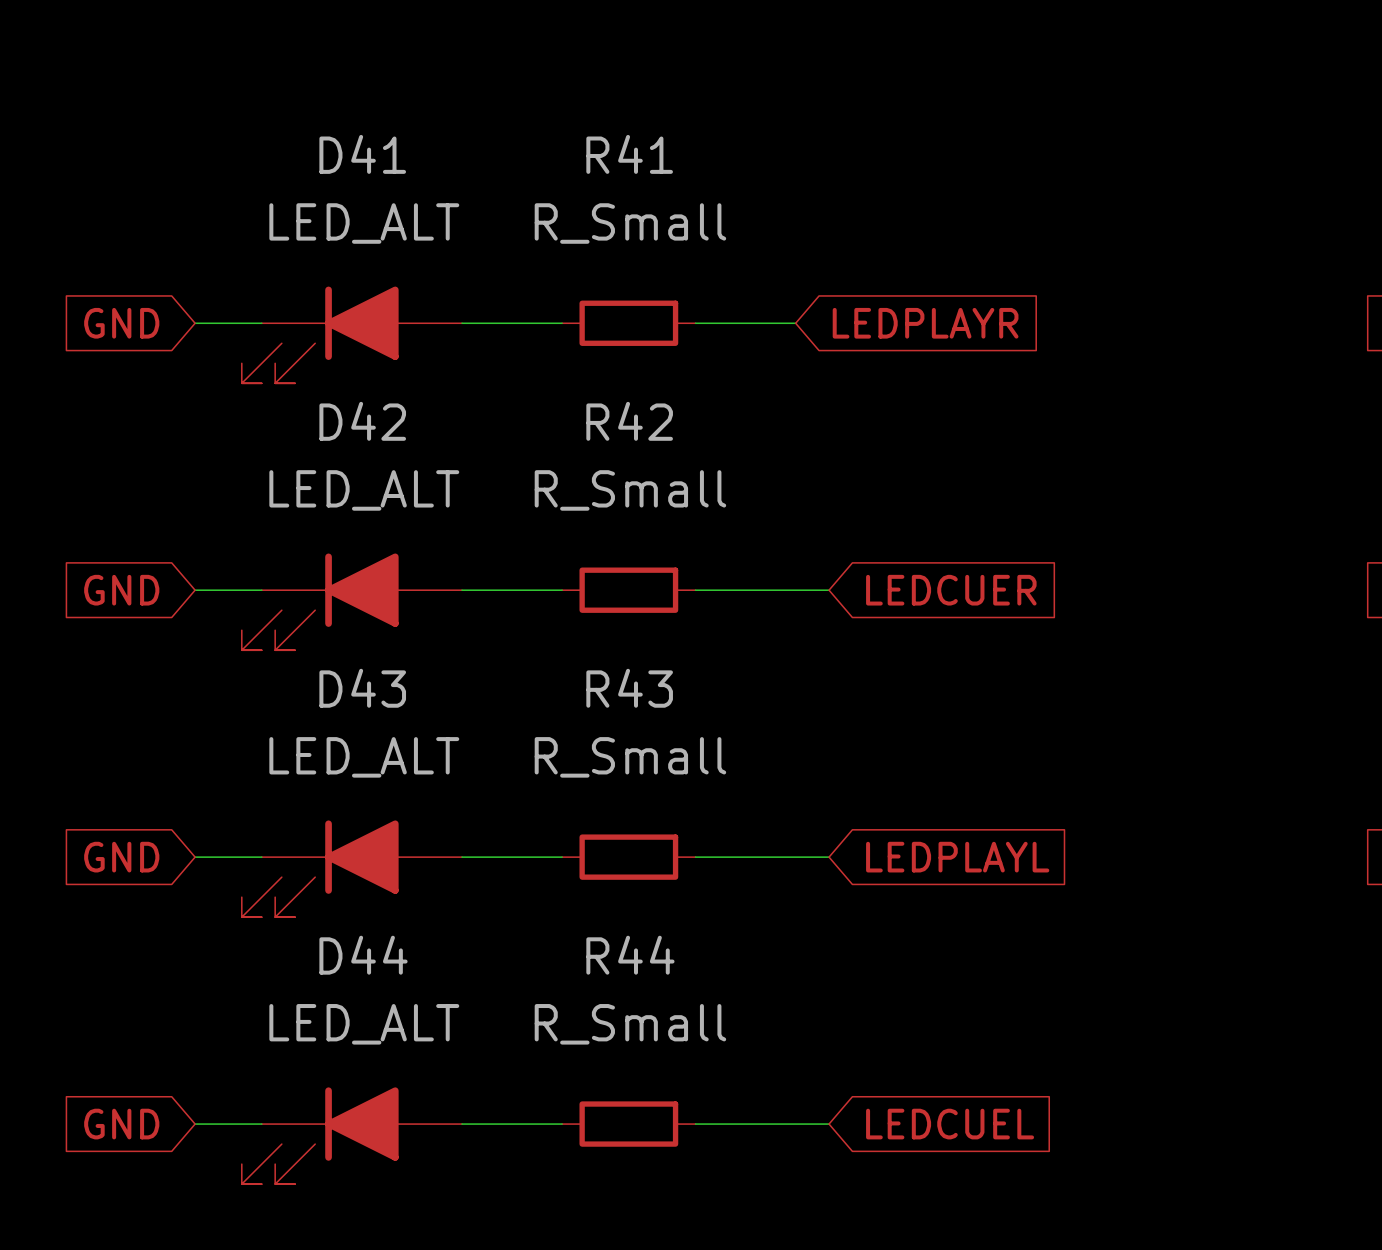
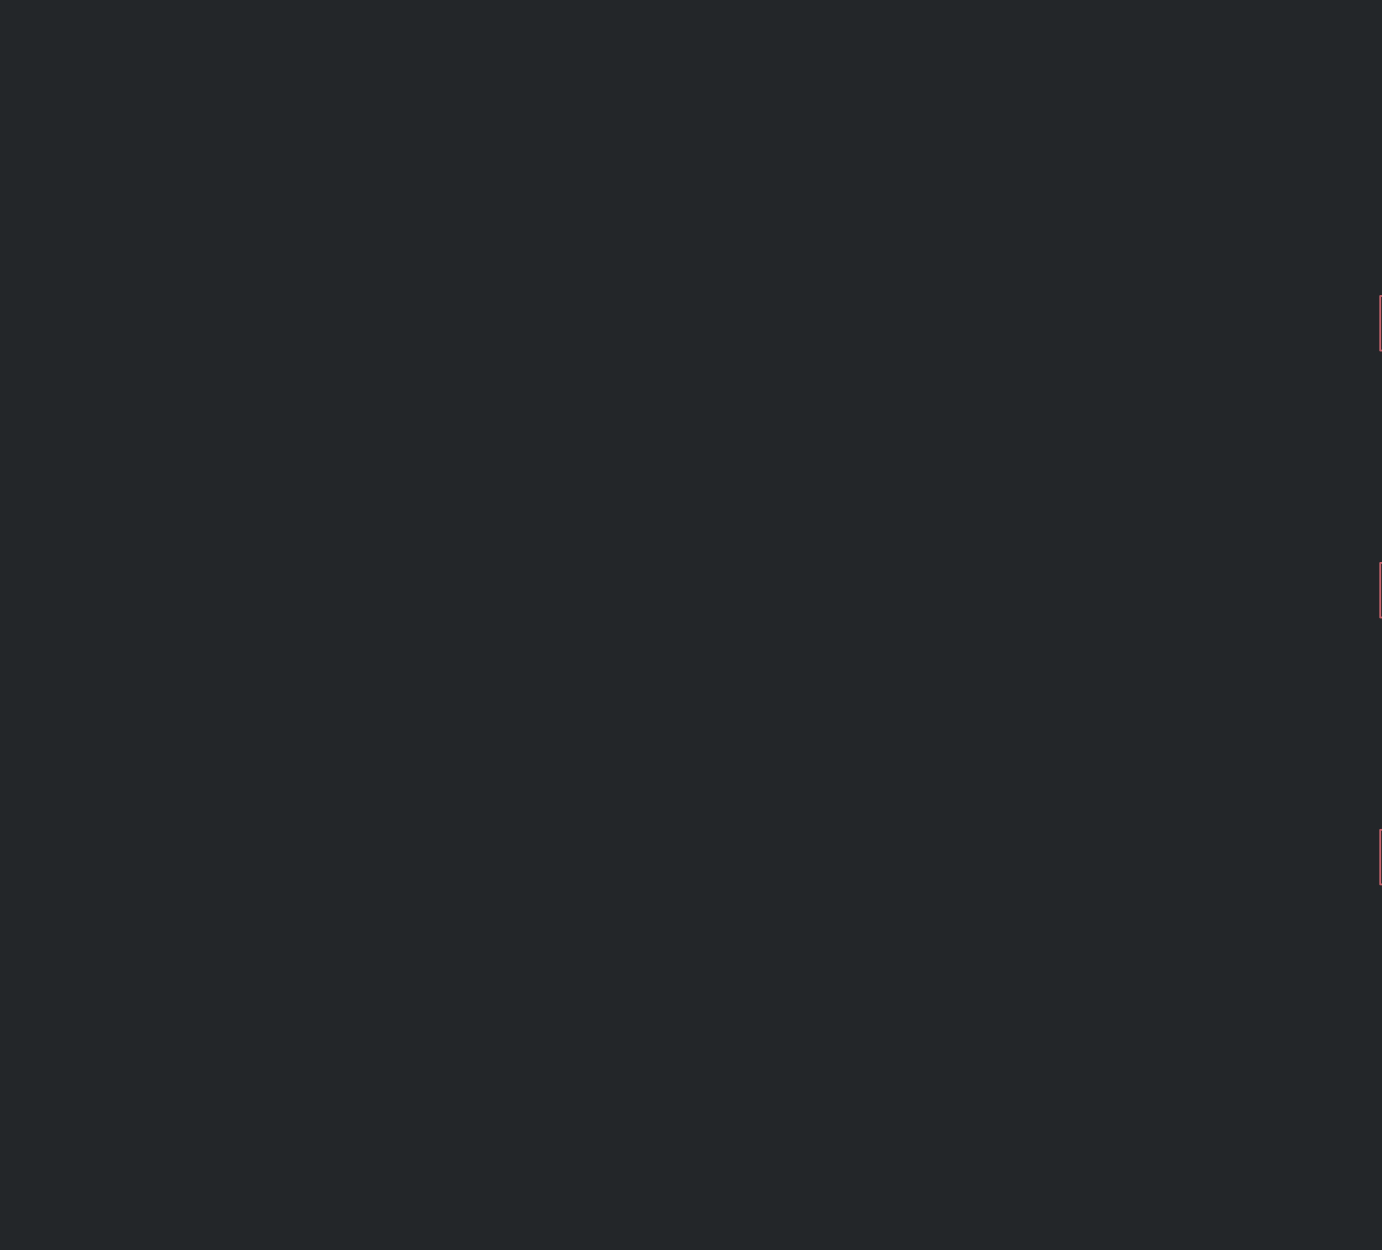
global label: GND (121, 323) -> none
wire: (195, 323) (261, 323) -> none
wire: (462, 323) (562, 323) -> none
R41: R_Small (628, 323) -> none
wire: (695, 323) (795, 323) -> none
global label: LEDPLAYR (925, 323) -> none
D41: LED_ALT (351, 334) -> none
global label: GND (121, 590) -> none
wire: (195, 590) (261, 590) -> none
wire: (462, 590) (562, 590) -> none
R42: R_Small (628, 590) -> none
wire: (695, 590) (829, 590) -> none
global label: LEDCUER (951, 590) -> none
D42: LED_ALT (351, 601) -> none
global label: GND (121, 857) -> none
wire: (195, 857) (261, 857) -> none
wire: (462, 857) (562, 857) -> none
R43: R_Small (628, 857) -> none
wire: (695, 857) (829, 857) -> none
global label: LEDPLAYL (957, 857) -> none
D43: LED_ALT (351, 868) -> none
global label: GND (121, 1124) -> none
wire: (195, 1124) (261, 1124) -> none
wire: (462, 1124) (562, 1124) -> none
R44: R_Small (628, 1124) -> none
wire: (695, 1124) (829, 1124) -> none
global label: LEDCUEL (950, 1124) -> none
D44: LED_ALT (351, 1135) -> none

